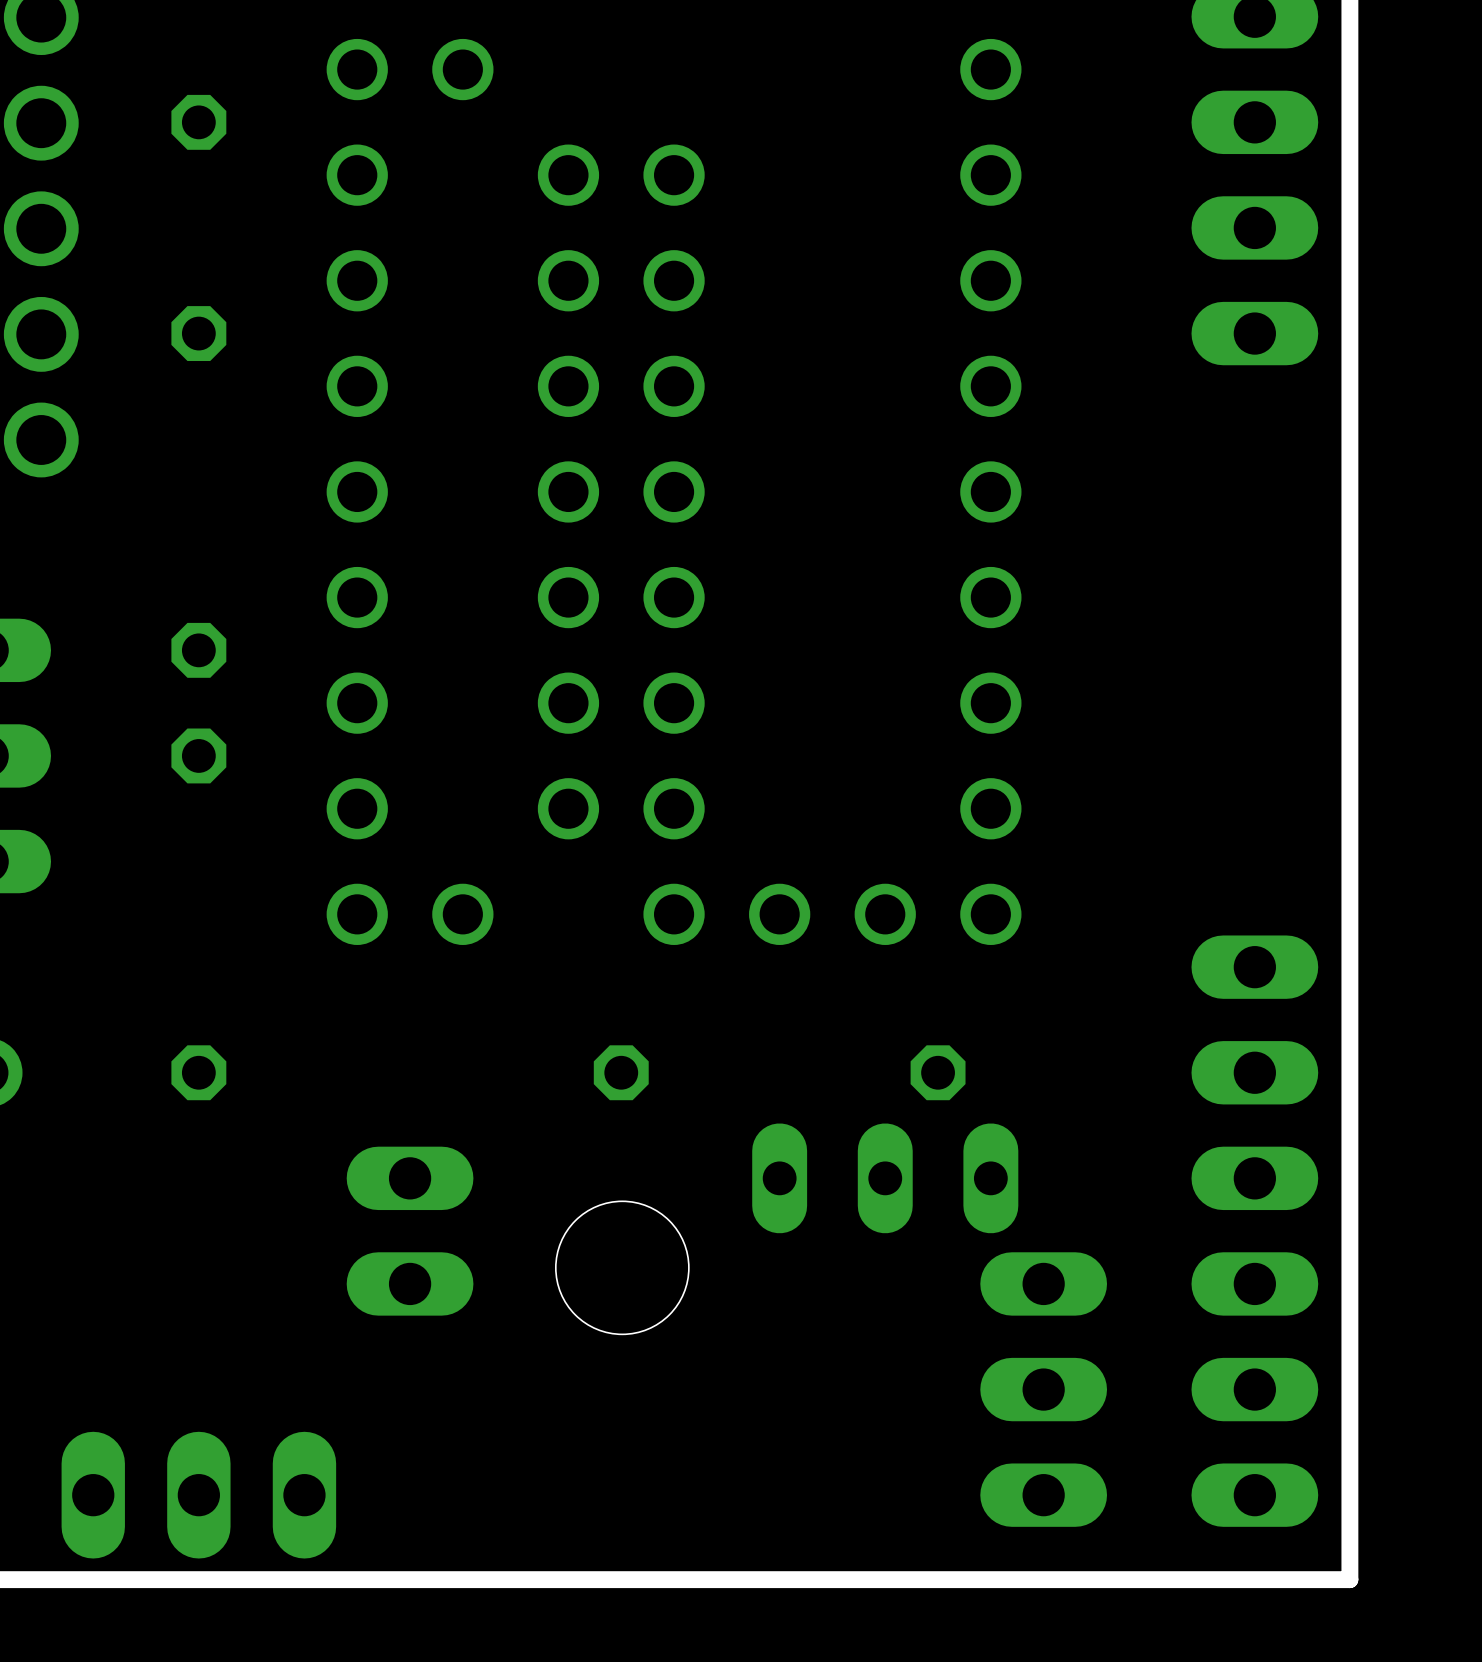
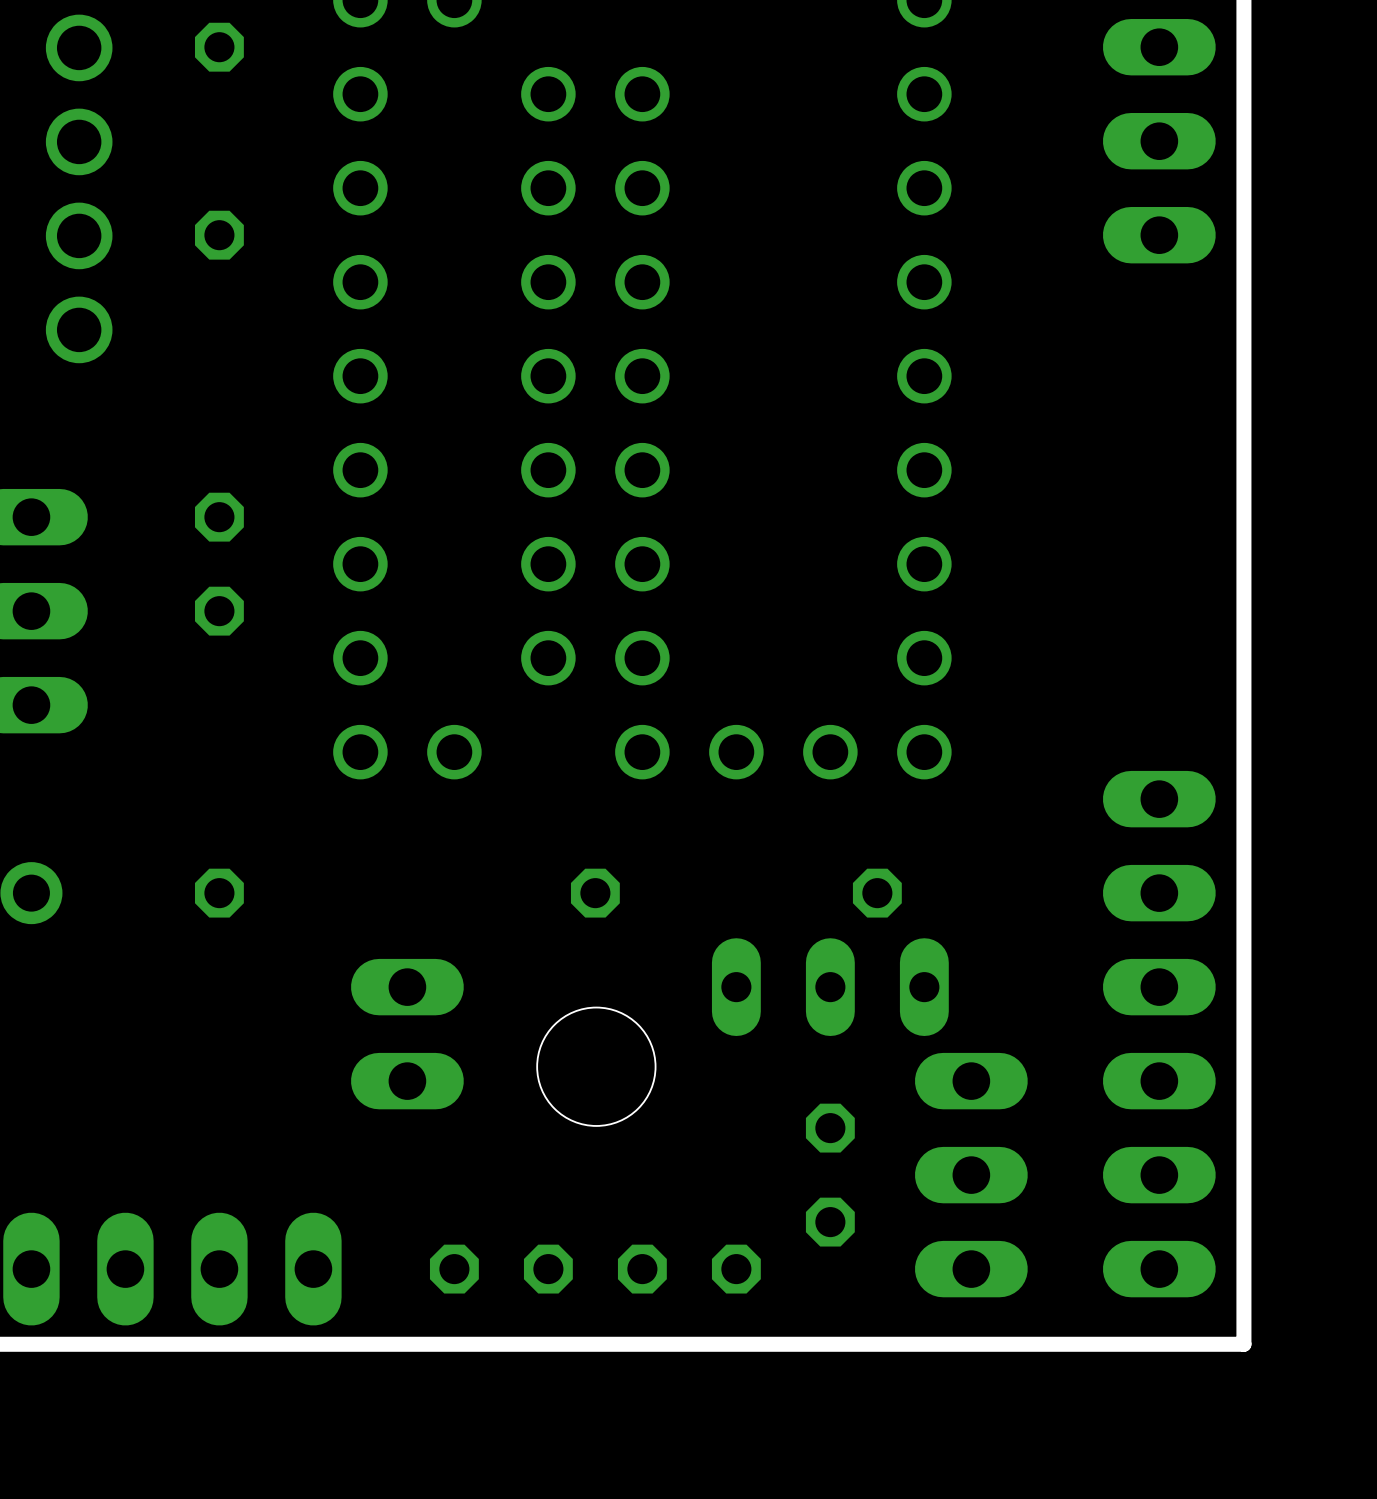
part: none -> (830, 1175)
part: none -> (501, 1269)
part: none -> (689, 1269)

